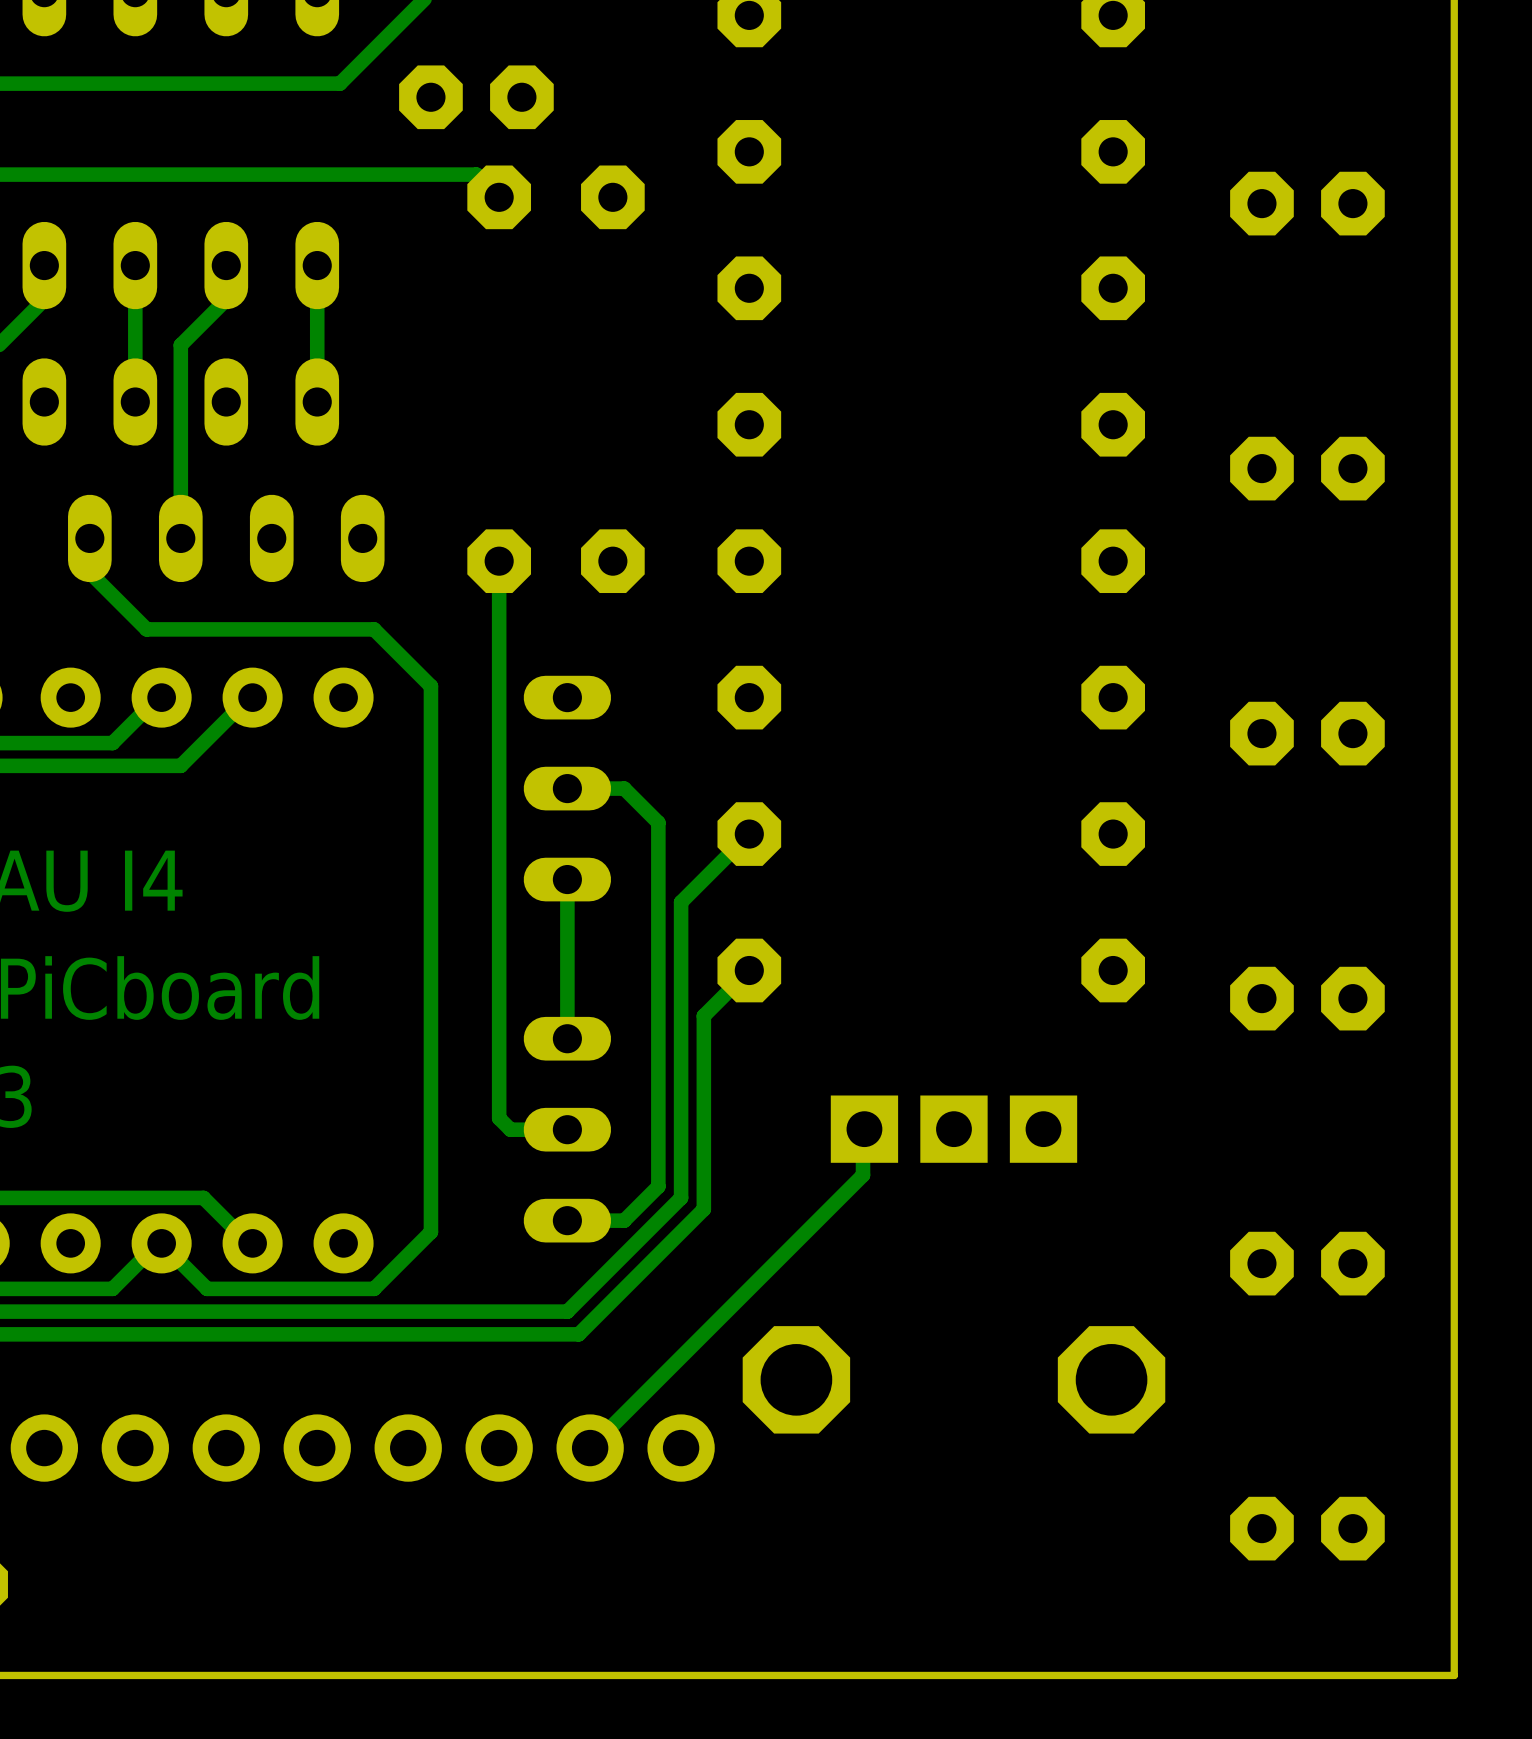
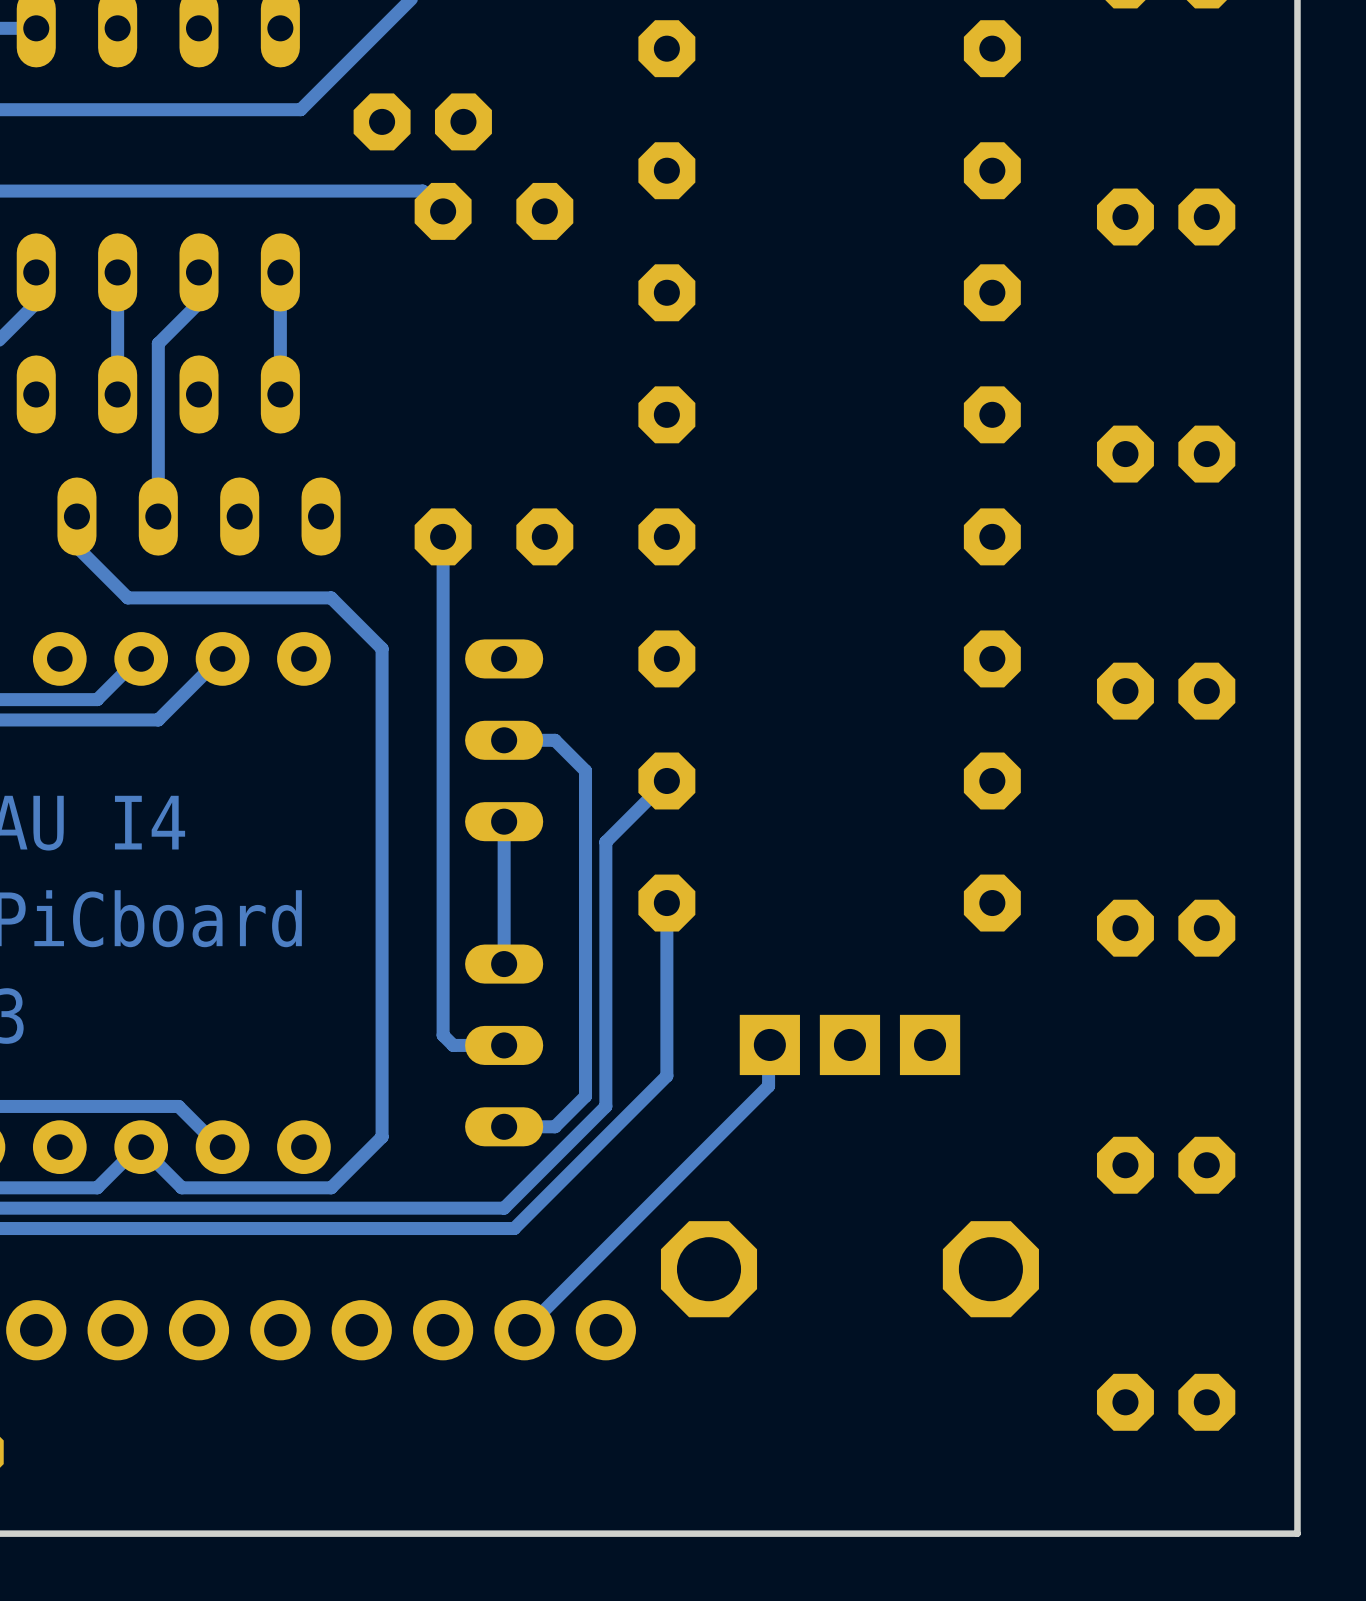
track: (749, 970) (703, 1015) (703, 1209) -> (666, 903) (666, 1075) (626, 1116)

